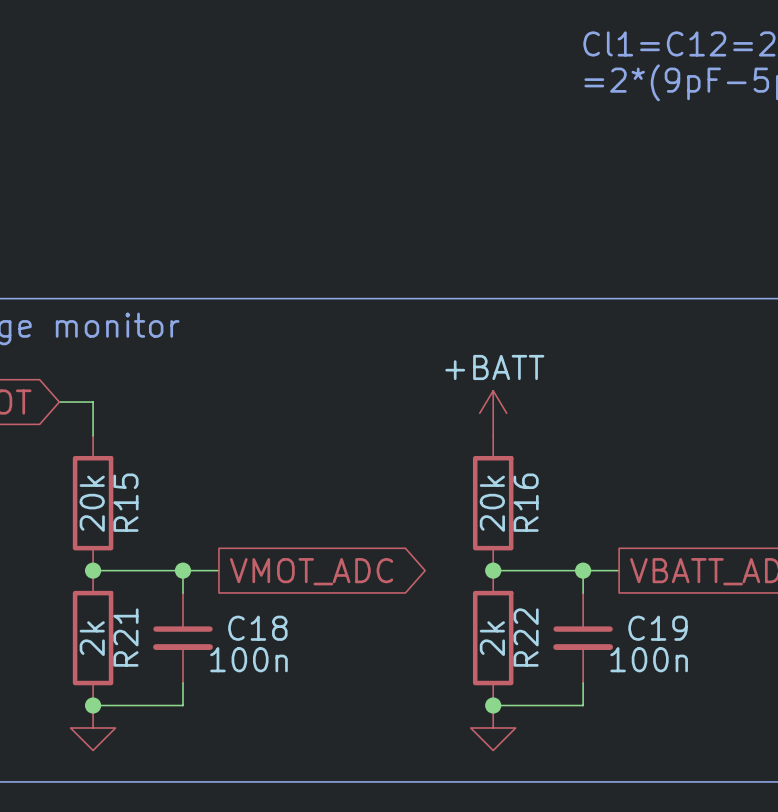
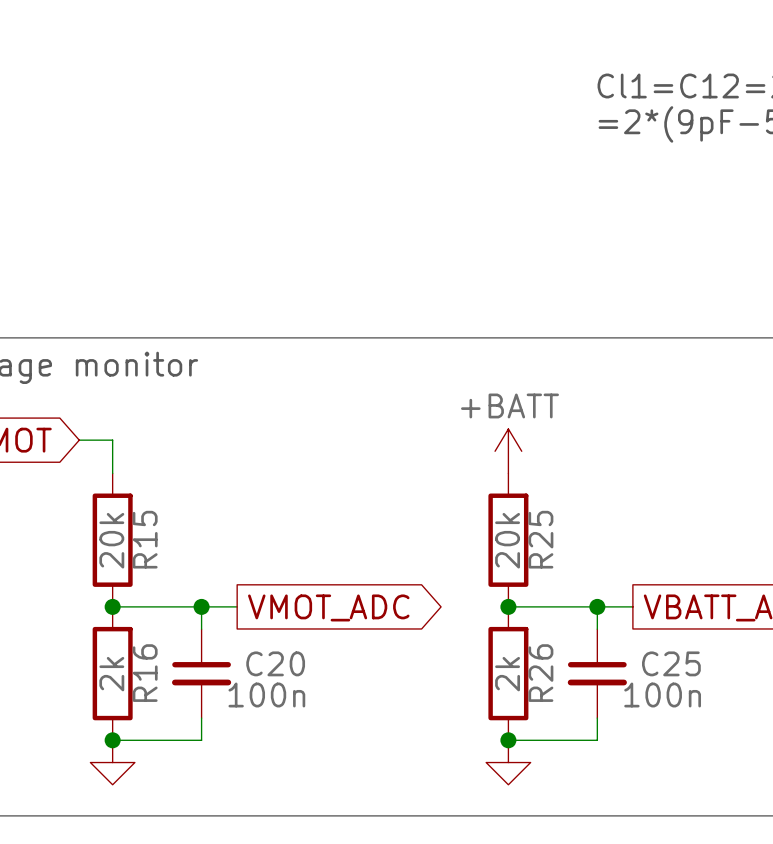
R16 name: R16 (526, 502) -> R25 (540, 539)
C18 name: C18 (257, 628) -> C20 (275, 663)
C19 name: C19 (658, 628) -> C25 (671, 663)
R21 name: R21 (125, 637) -> R16 (145, 673)
R22 name: R22 (526, 637) -> R26 (540, 673)

